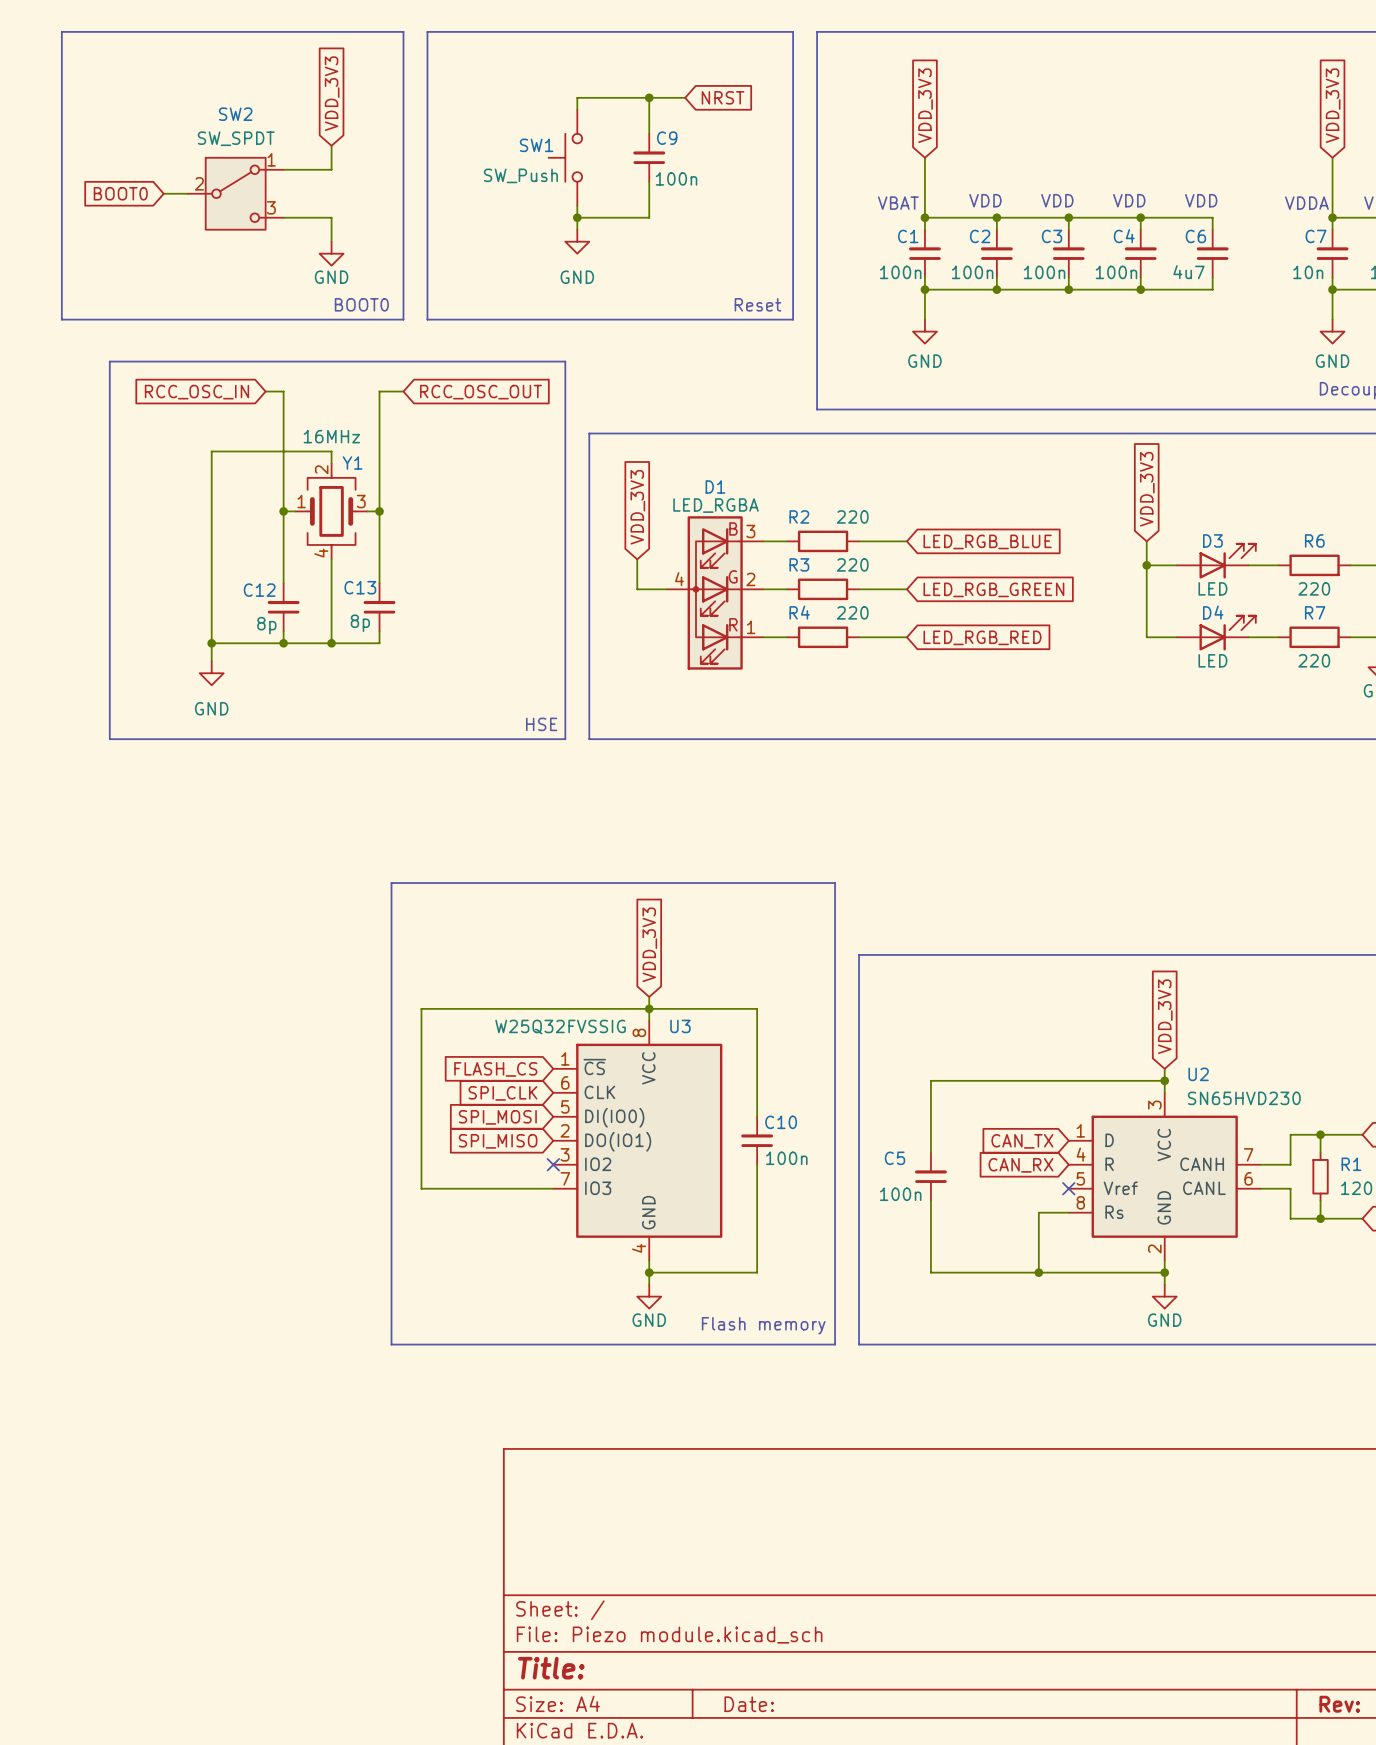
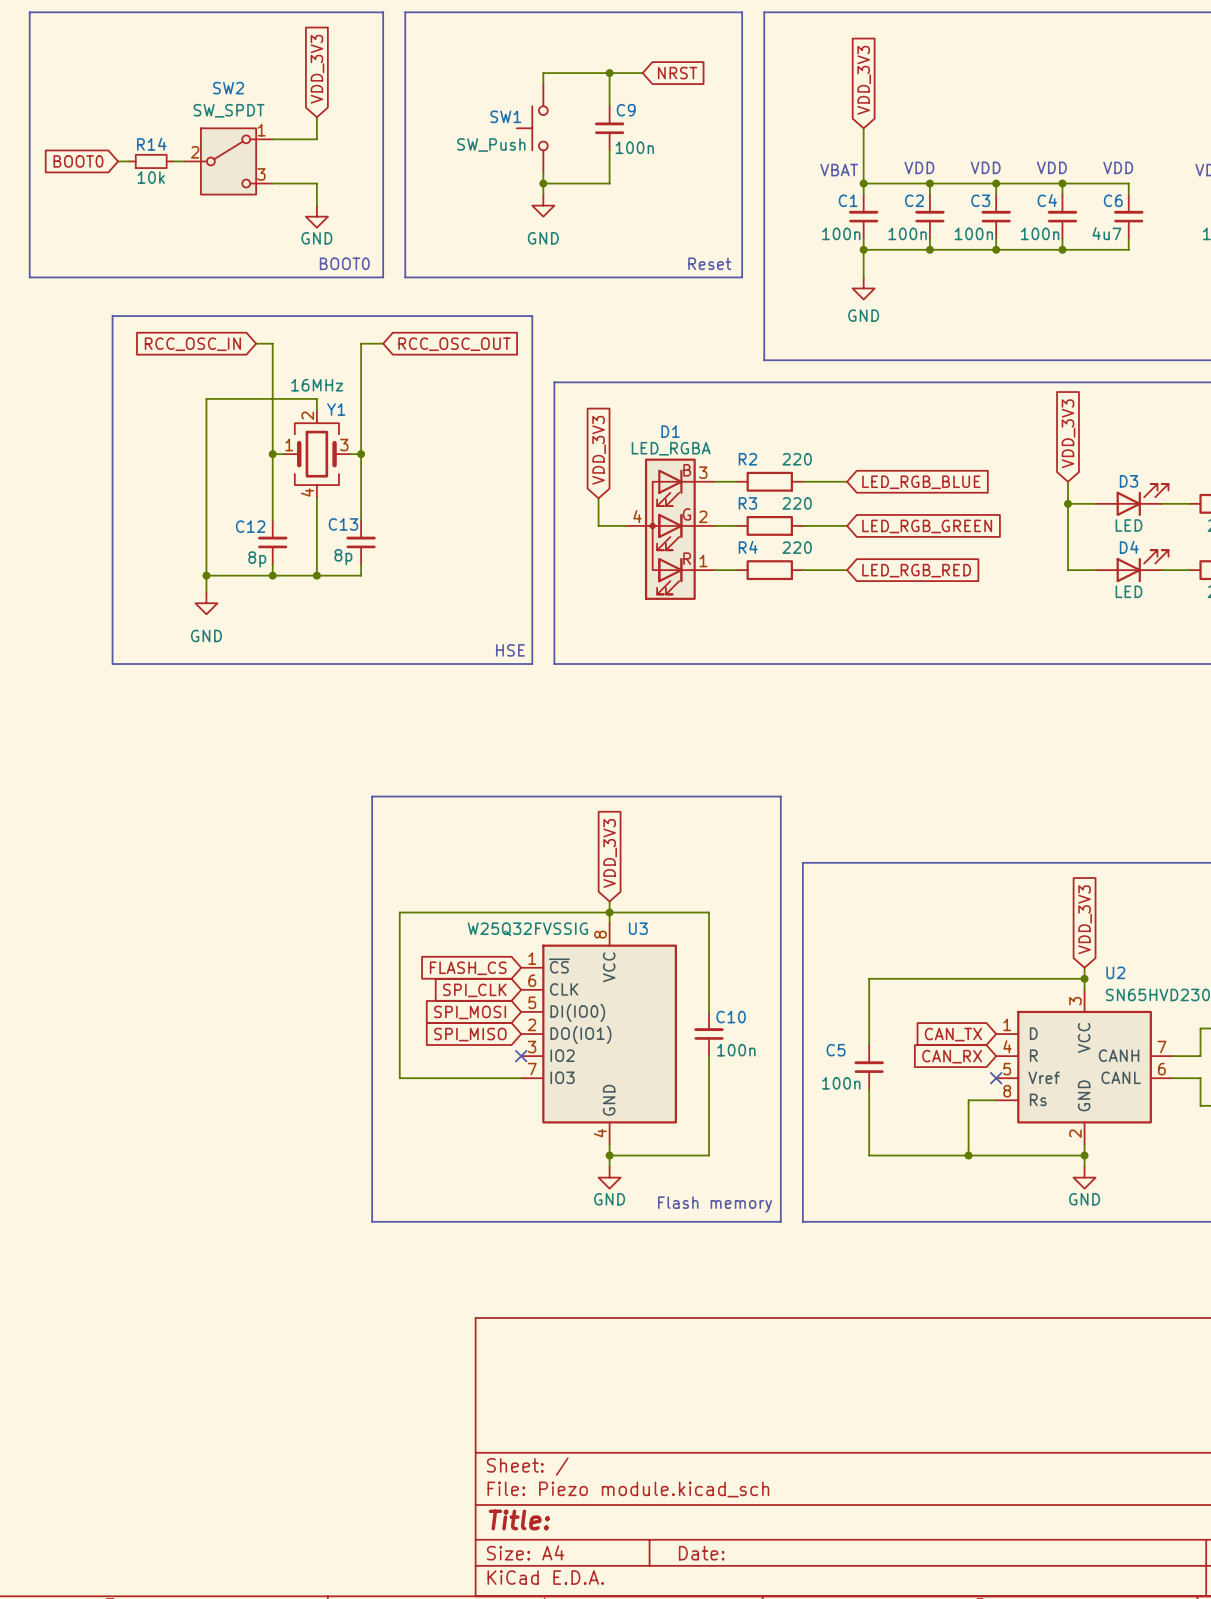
line: (61, 31) (61, 319) -> (68, 12) (29, 12) (29, 277) (68, 277)
global label position: BOOT0 (120, 193) -> BOOT0 (78, 161)
R14: none -> 10k (151, 161)

